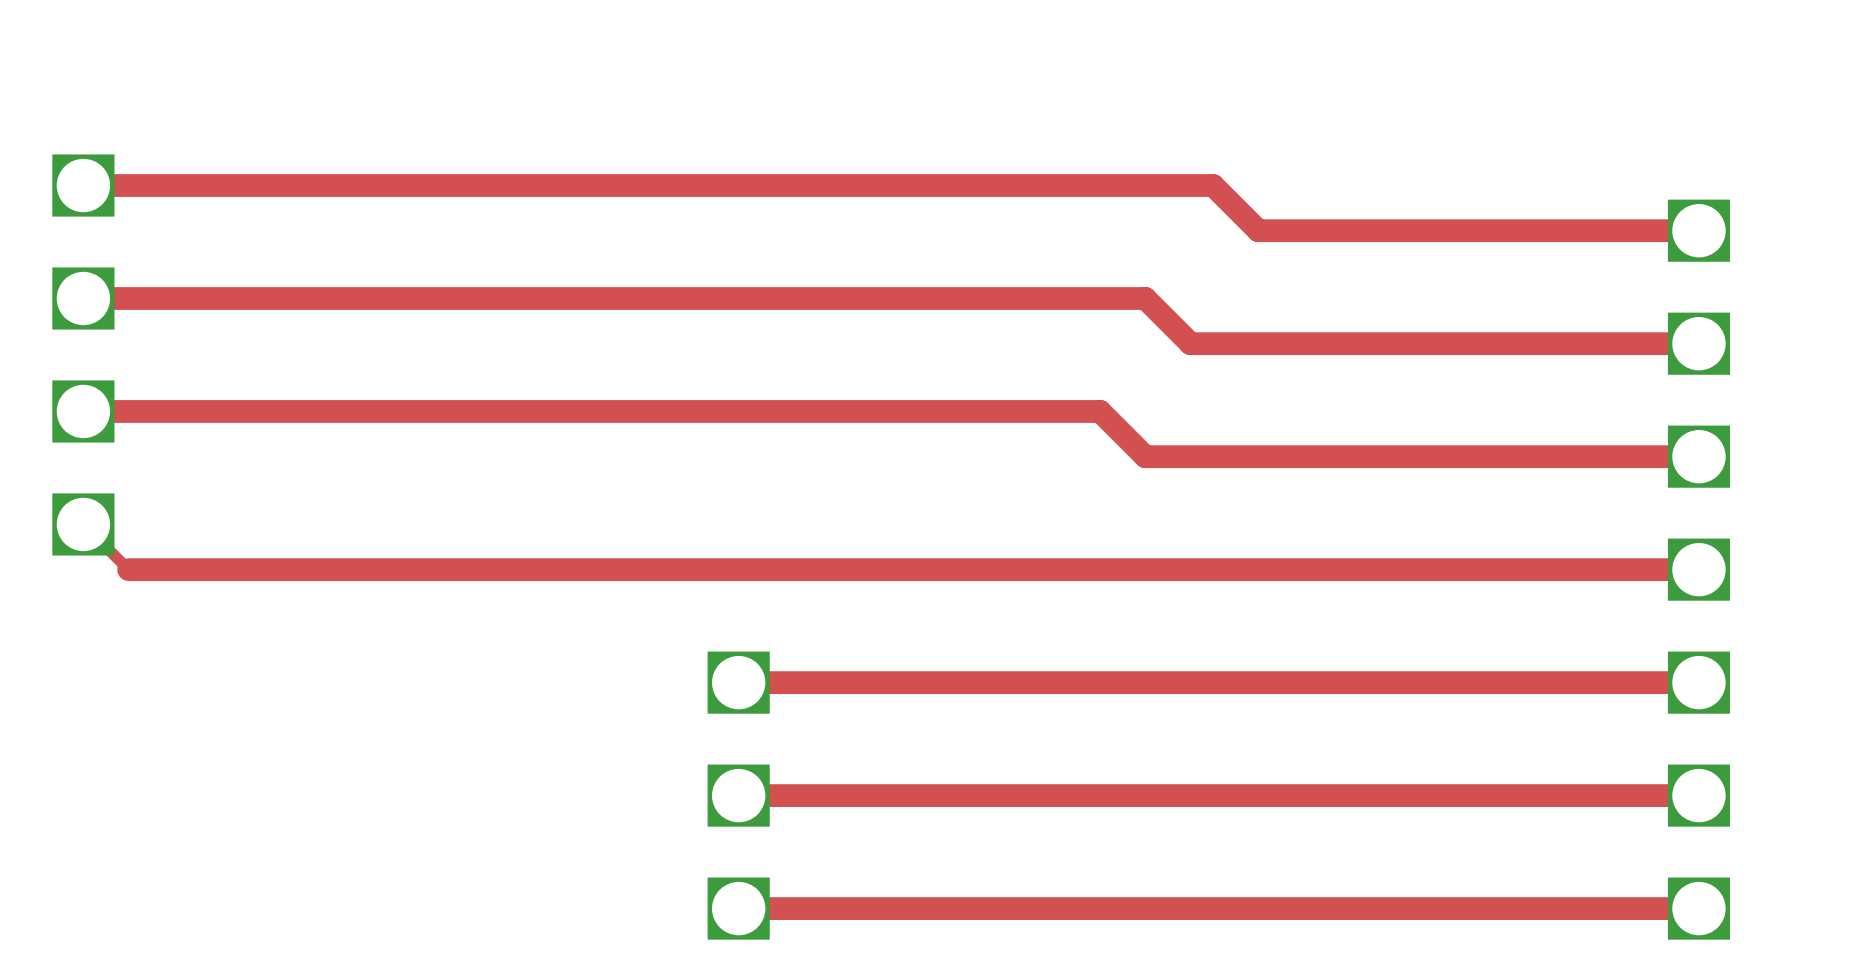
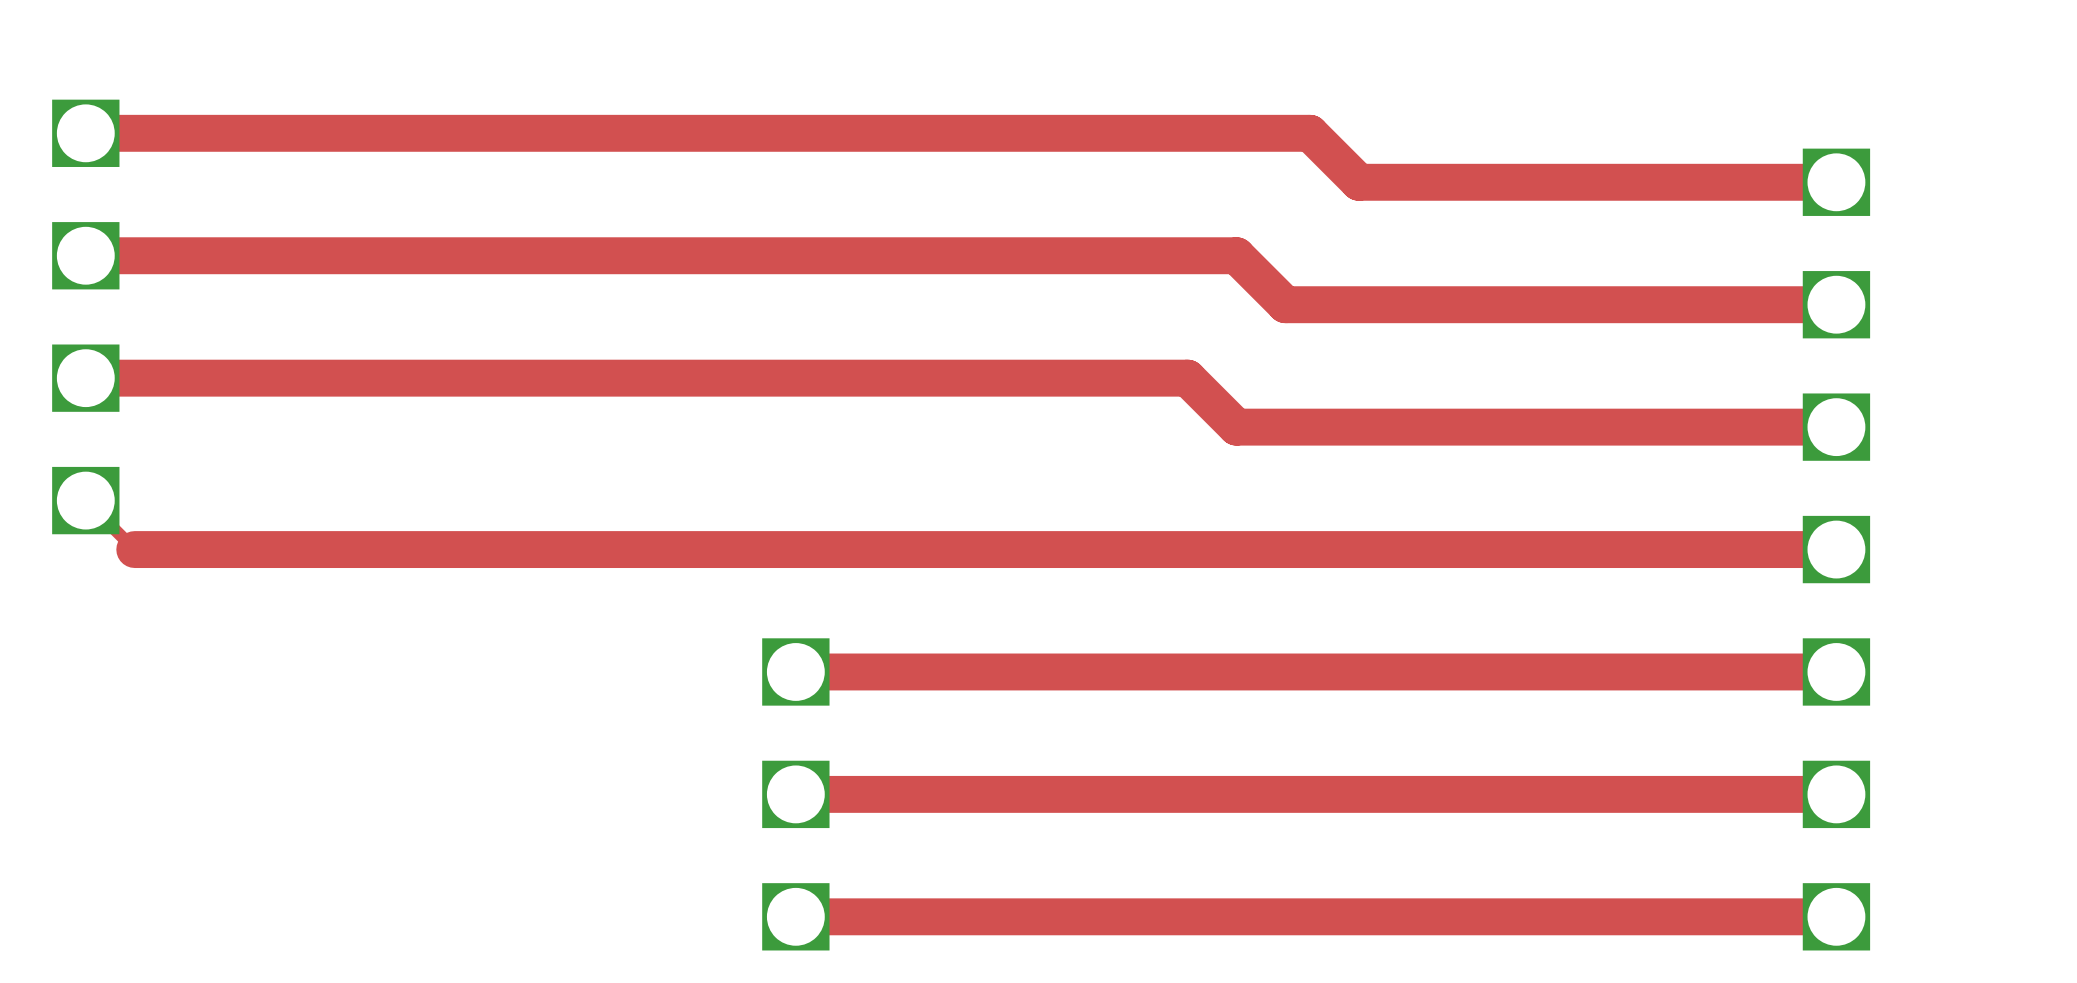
top track width: thin (83, 185) (1213, 185) (1258, 230) (1698, 230) -> thick (85, 133) (1310, 133) (1358, 182) (1836, 182)
top track width: thin (83, 298) (1145, 298) (1190, 343) (1698, 343) -> thick (85, 255) (1236, 255) (1285, 304) (1836, 304)
top track width: thin (83, 411) (1100, 411) (1145, 456) (1698, 456) -> thick (85, 378) (1187, 378) (1236, 427) (1836, 427)
top track width: thin (1698, 569) (128, 569) -> thick (1836, 549) (134, 549)
top track width: thin (1698, 682) (738, 682) -> thick (1836, 671) (795, 671)
top track width: thin (1698, 795) (738, 795) -> thick (1836, 794) (795, 794)
top track width: thin (1698, 908) (738, 908) -> thick (1836, 916) (795, 916)

